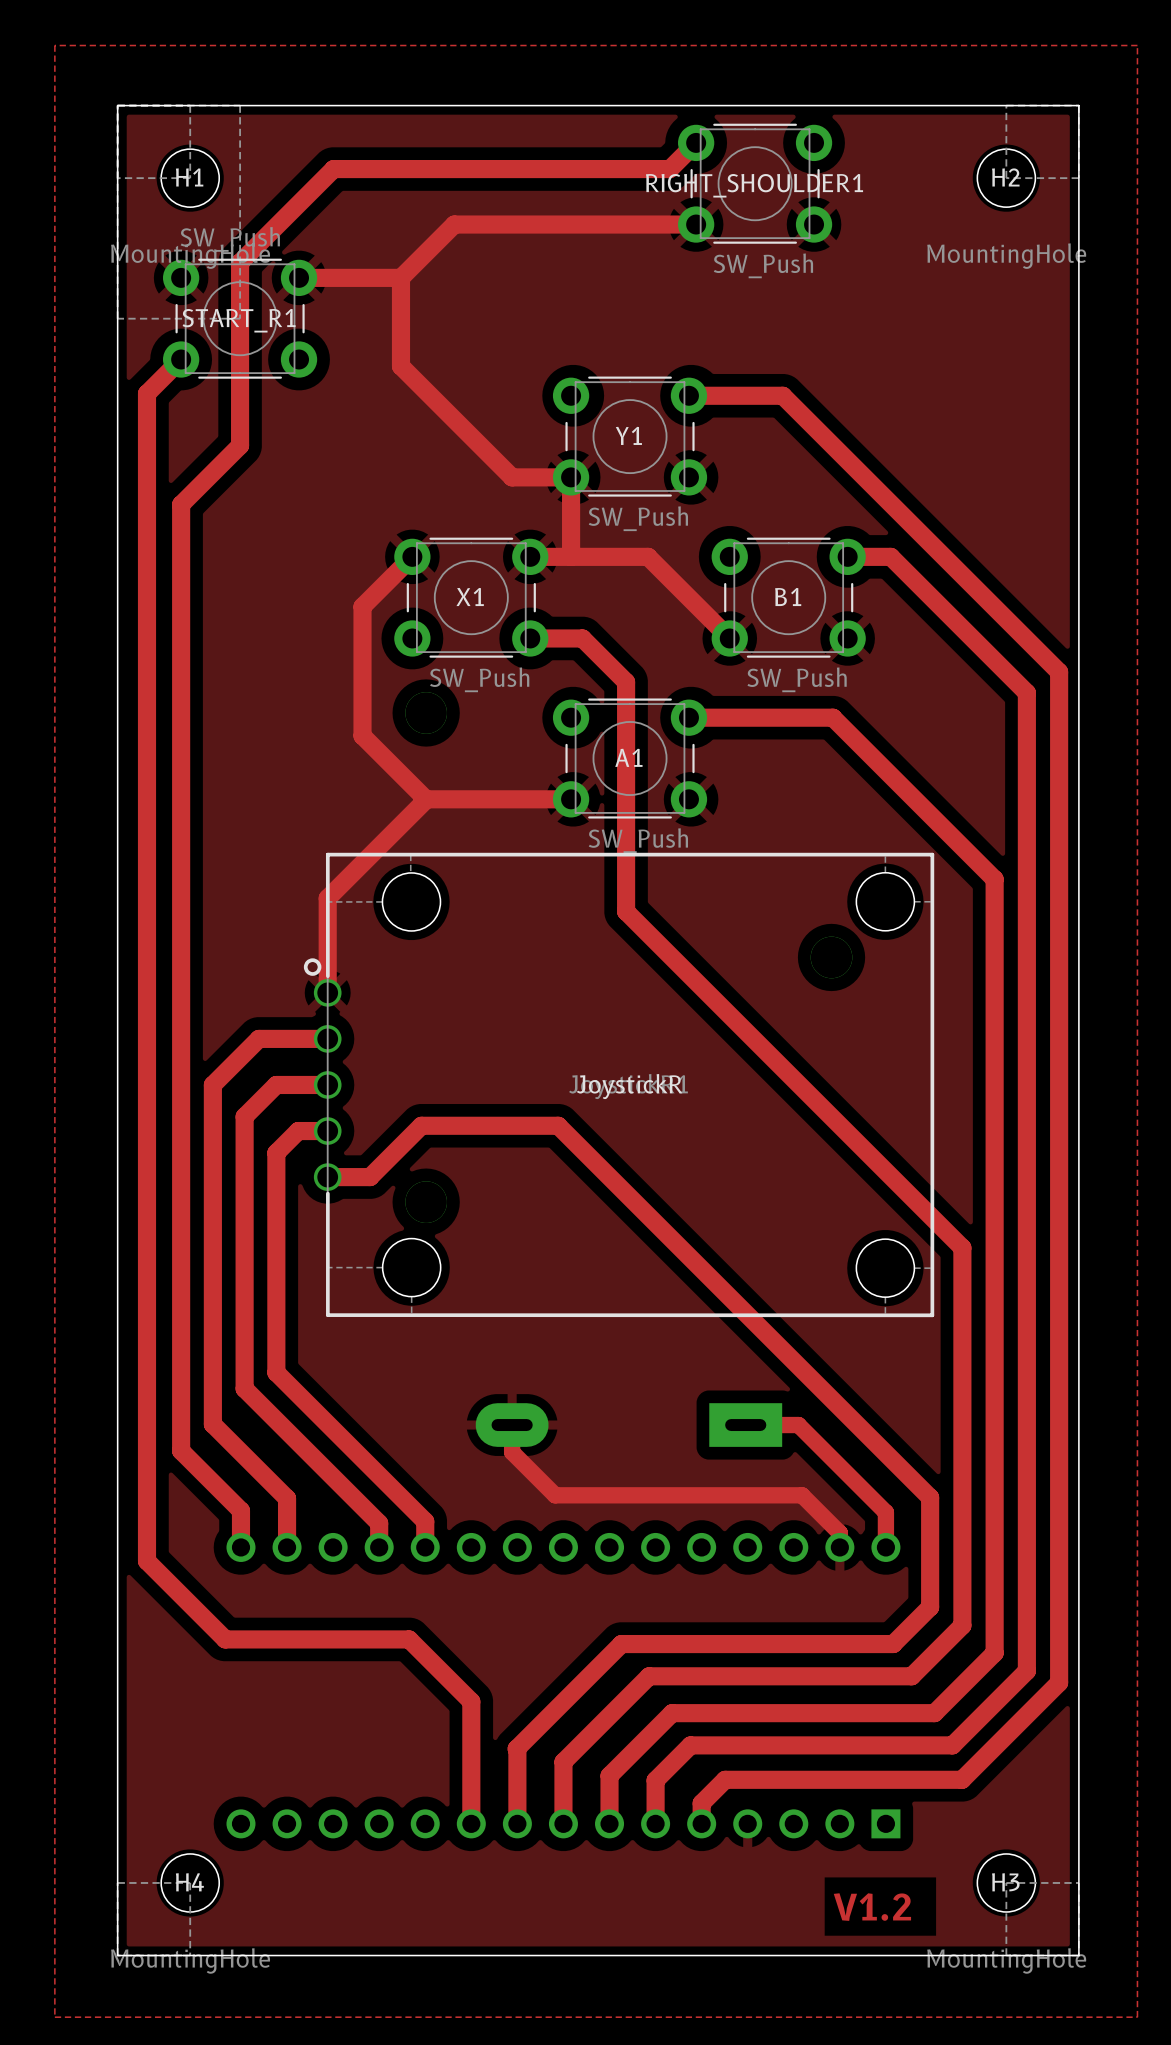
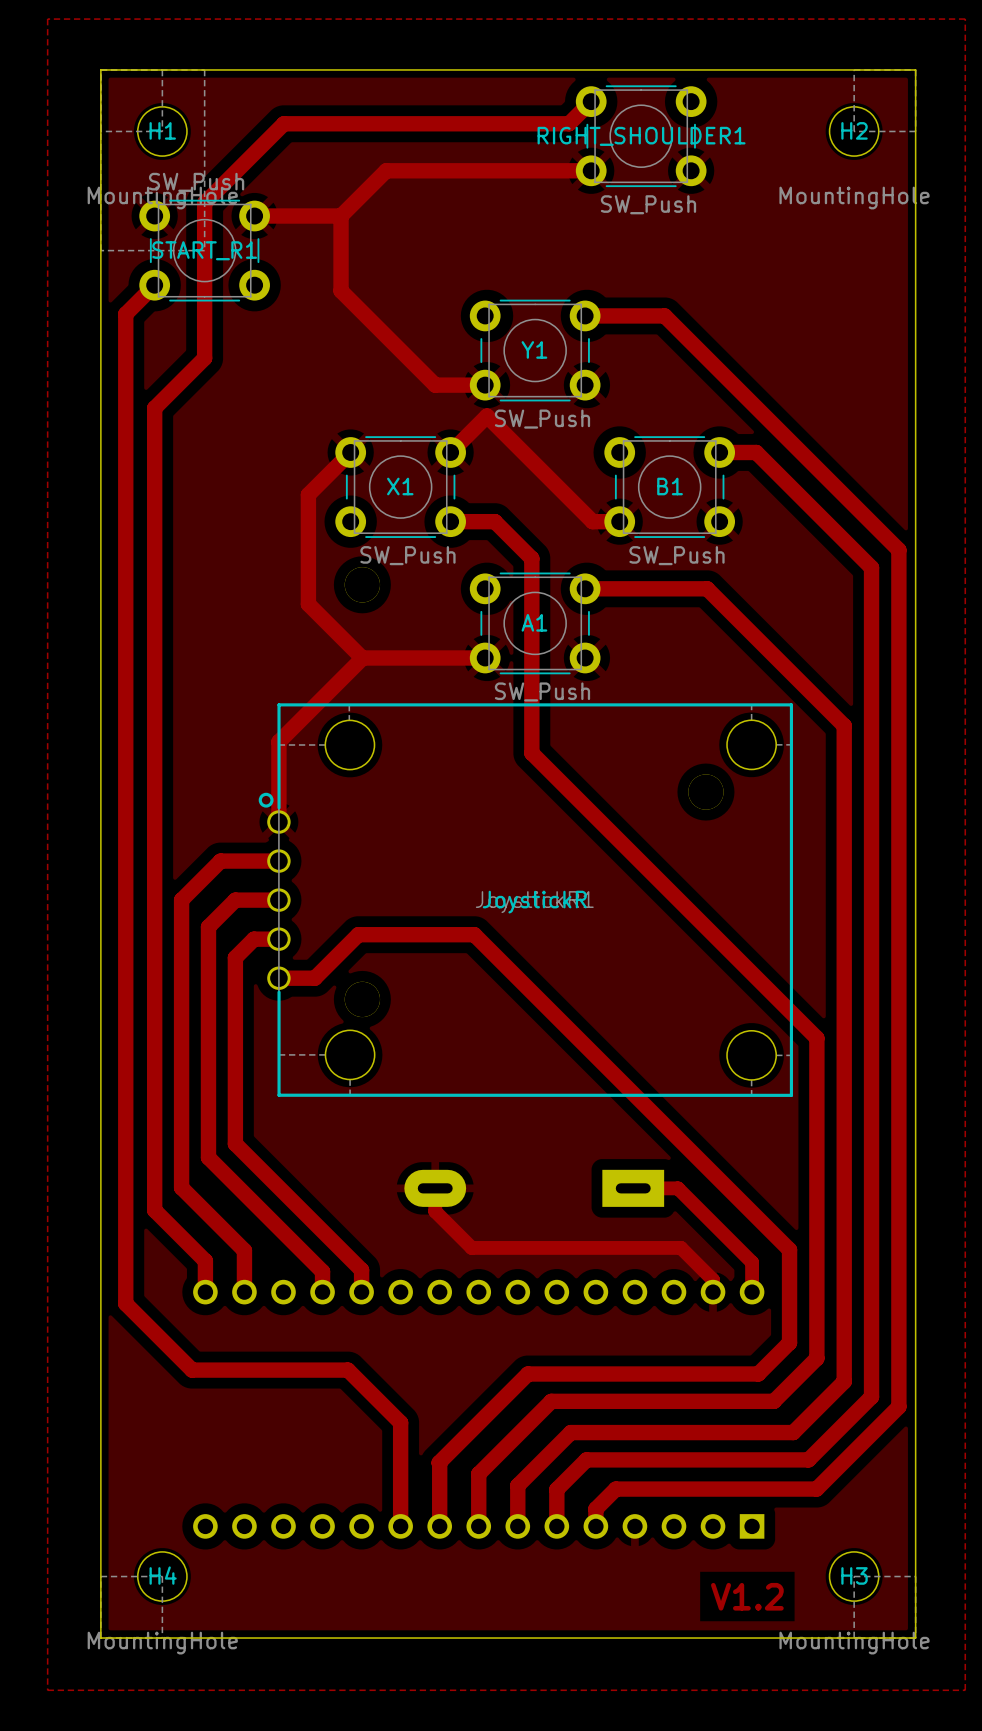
track: (573, 479) (571, 477) (571, 556) -> none
track: (530, 556) (648, 556) (729, 638) -> (450, 452) (487, 416) (592, 521) (619, 521)

